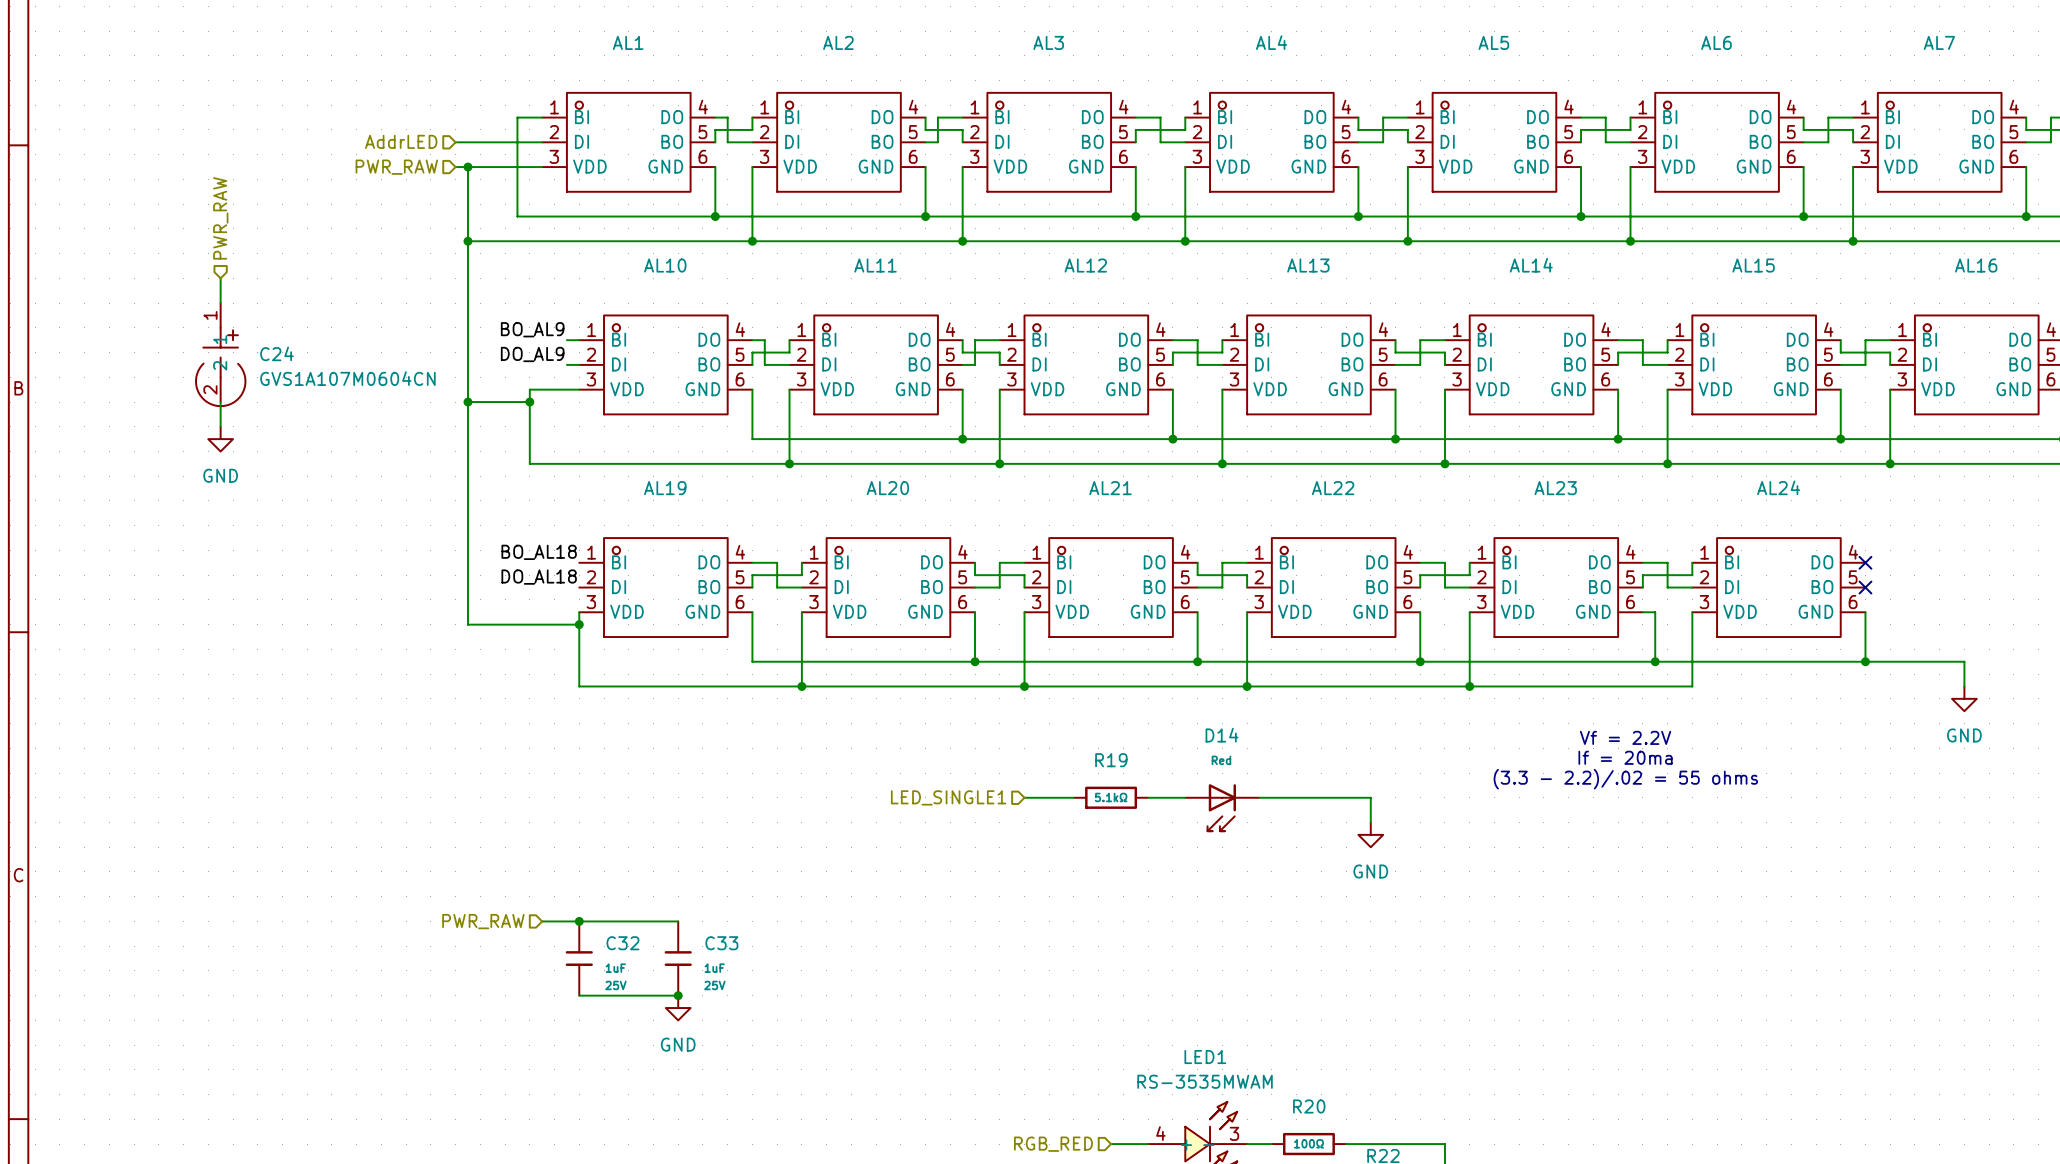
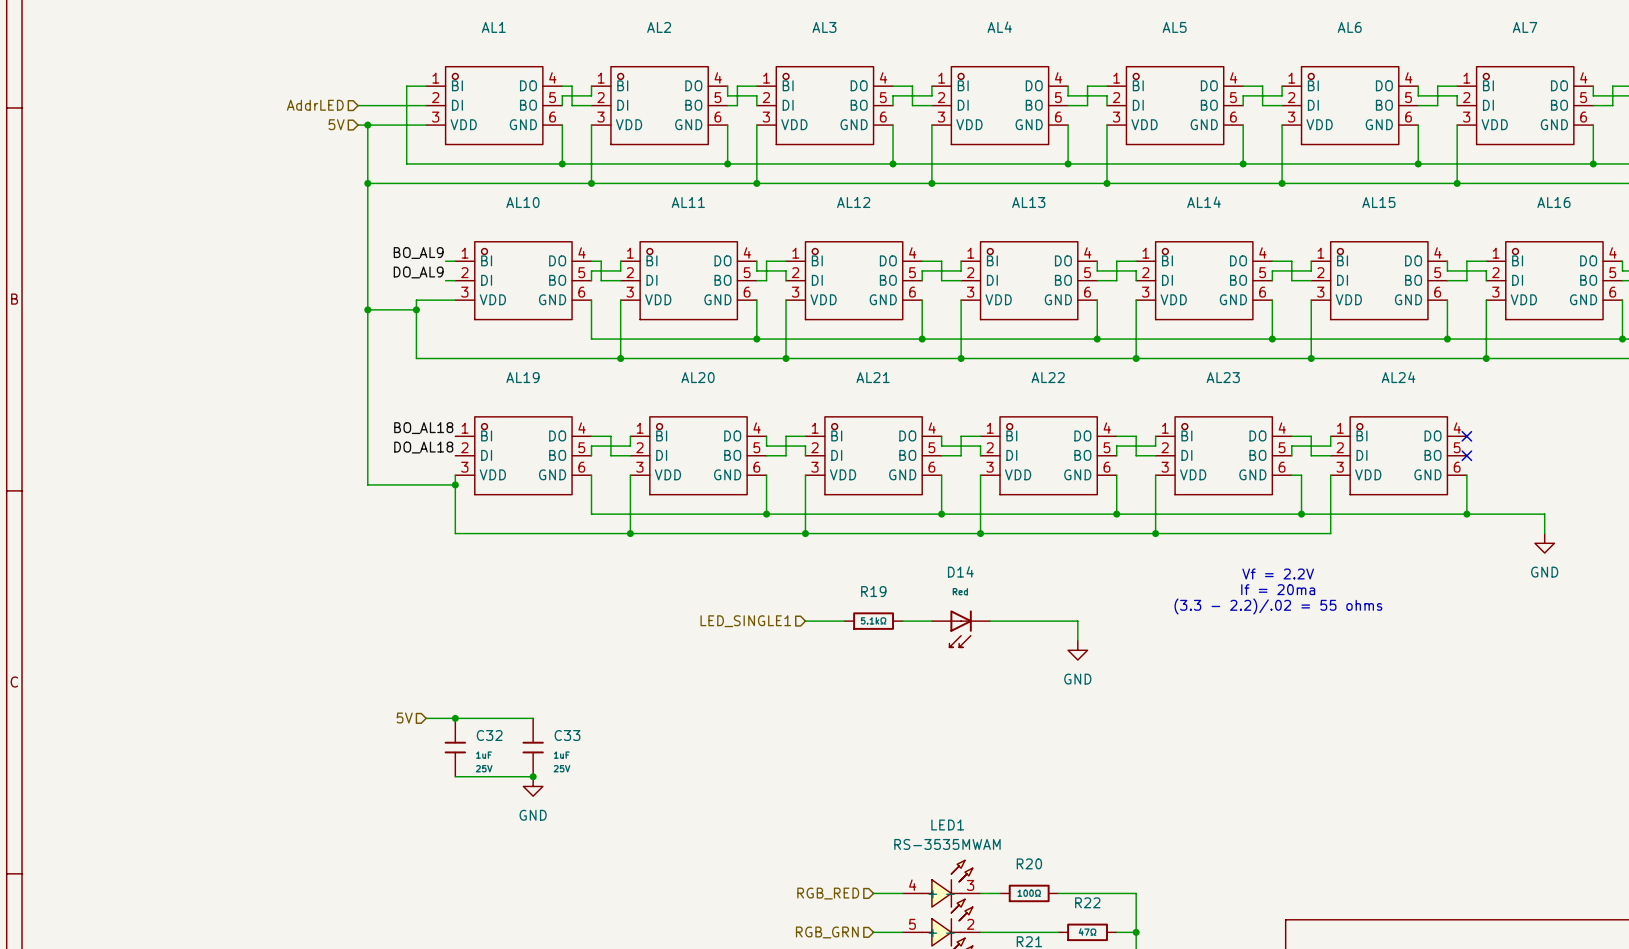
hierarchical label: PWR_RAW (396, 167) -> 5V (336, 124)
hierarchical label: PWR_RAW (220, 218) -> none
wire: (220, 278) (220, 303) -> none
C24: GVS1A107M0604CN (220, 354) -> none
wire: (220, 402) (220, 426) -> none
power symbol: GND (220, 439) -> none
hierarchical label: PWR_RAW (483, 921) -> 5V (404, 718)

